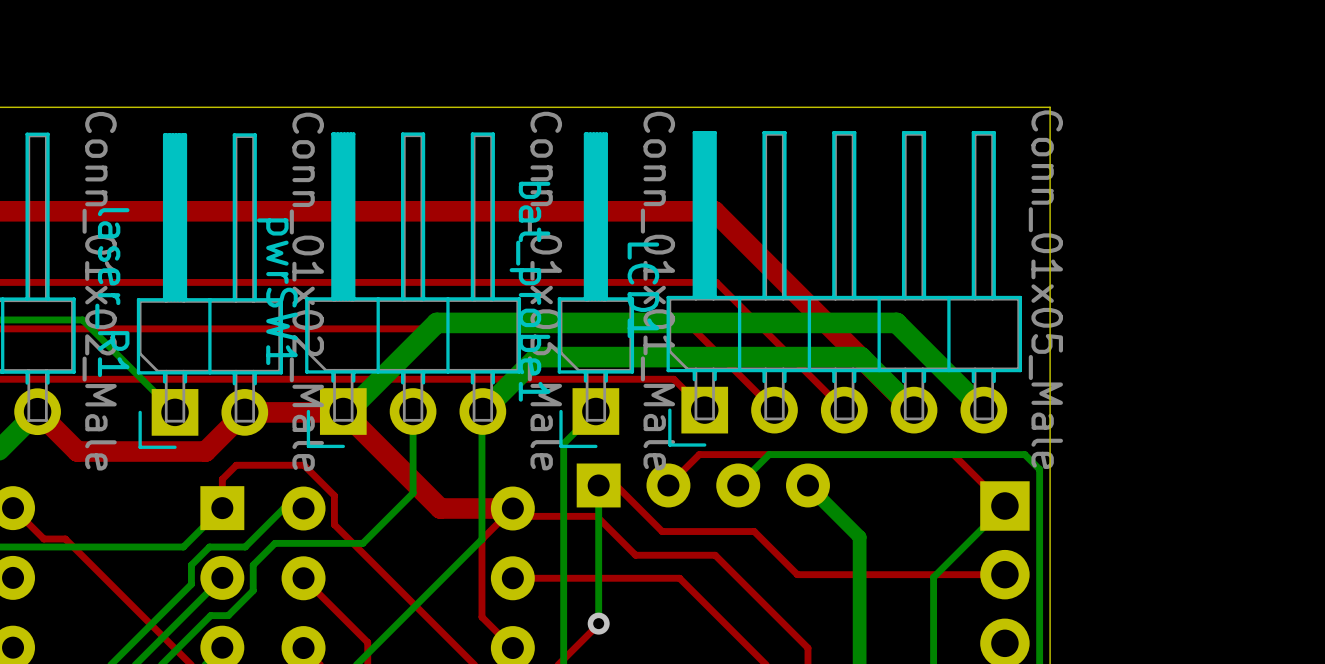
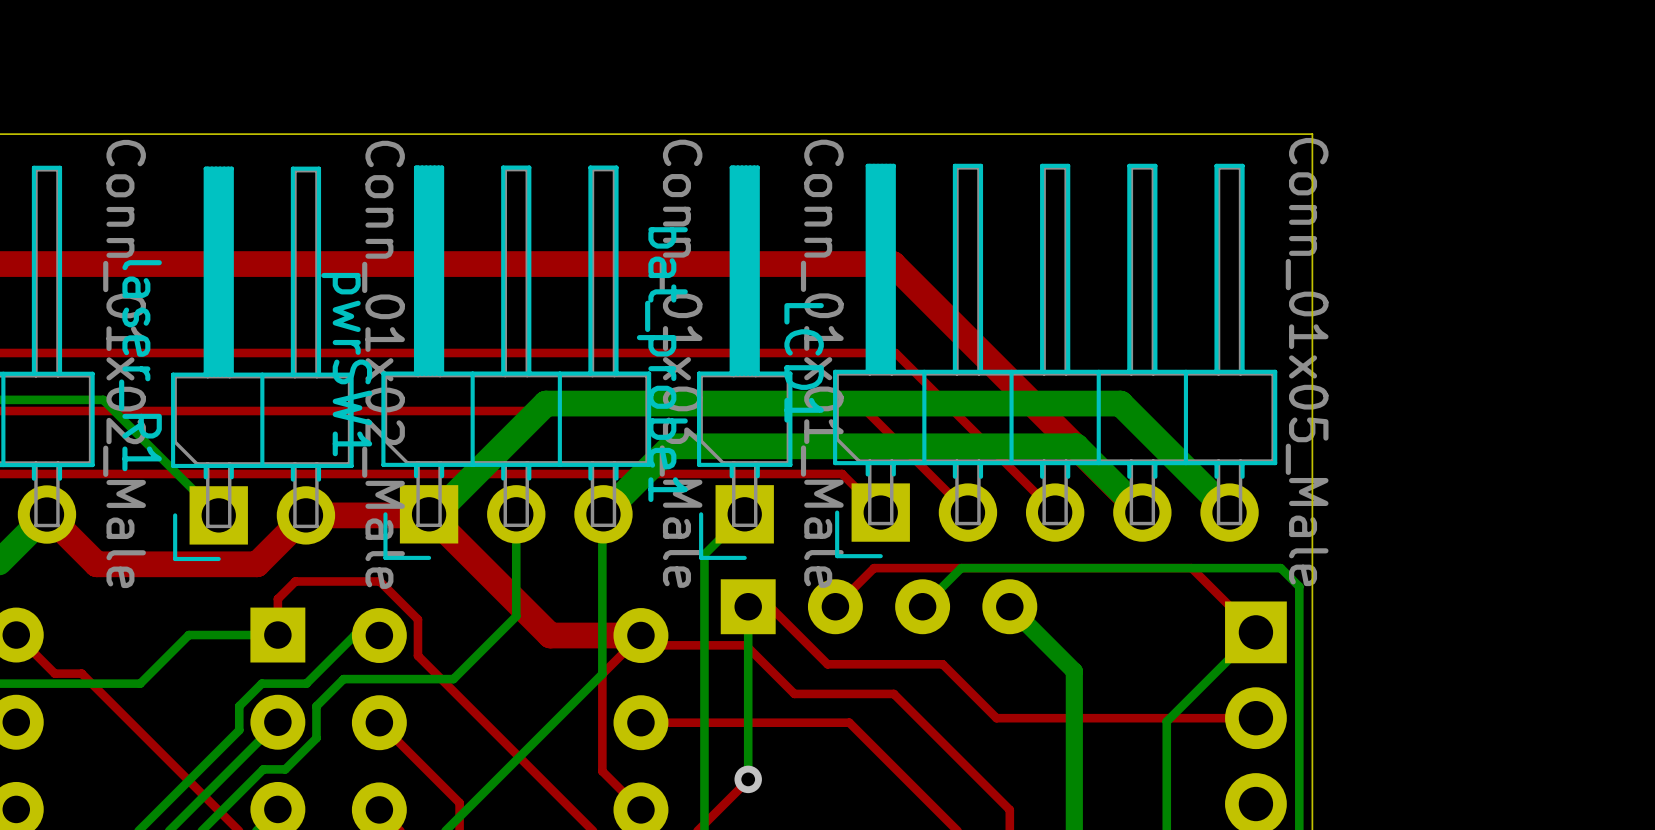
bottom track: (222, 508) (183, 547) (112, 547) -> (277, 635) (188, 635) (140, 683)

